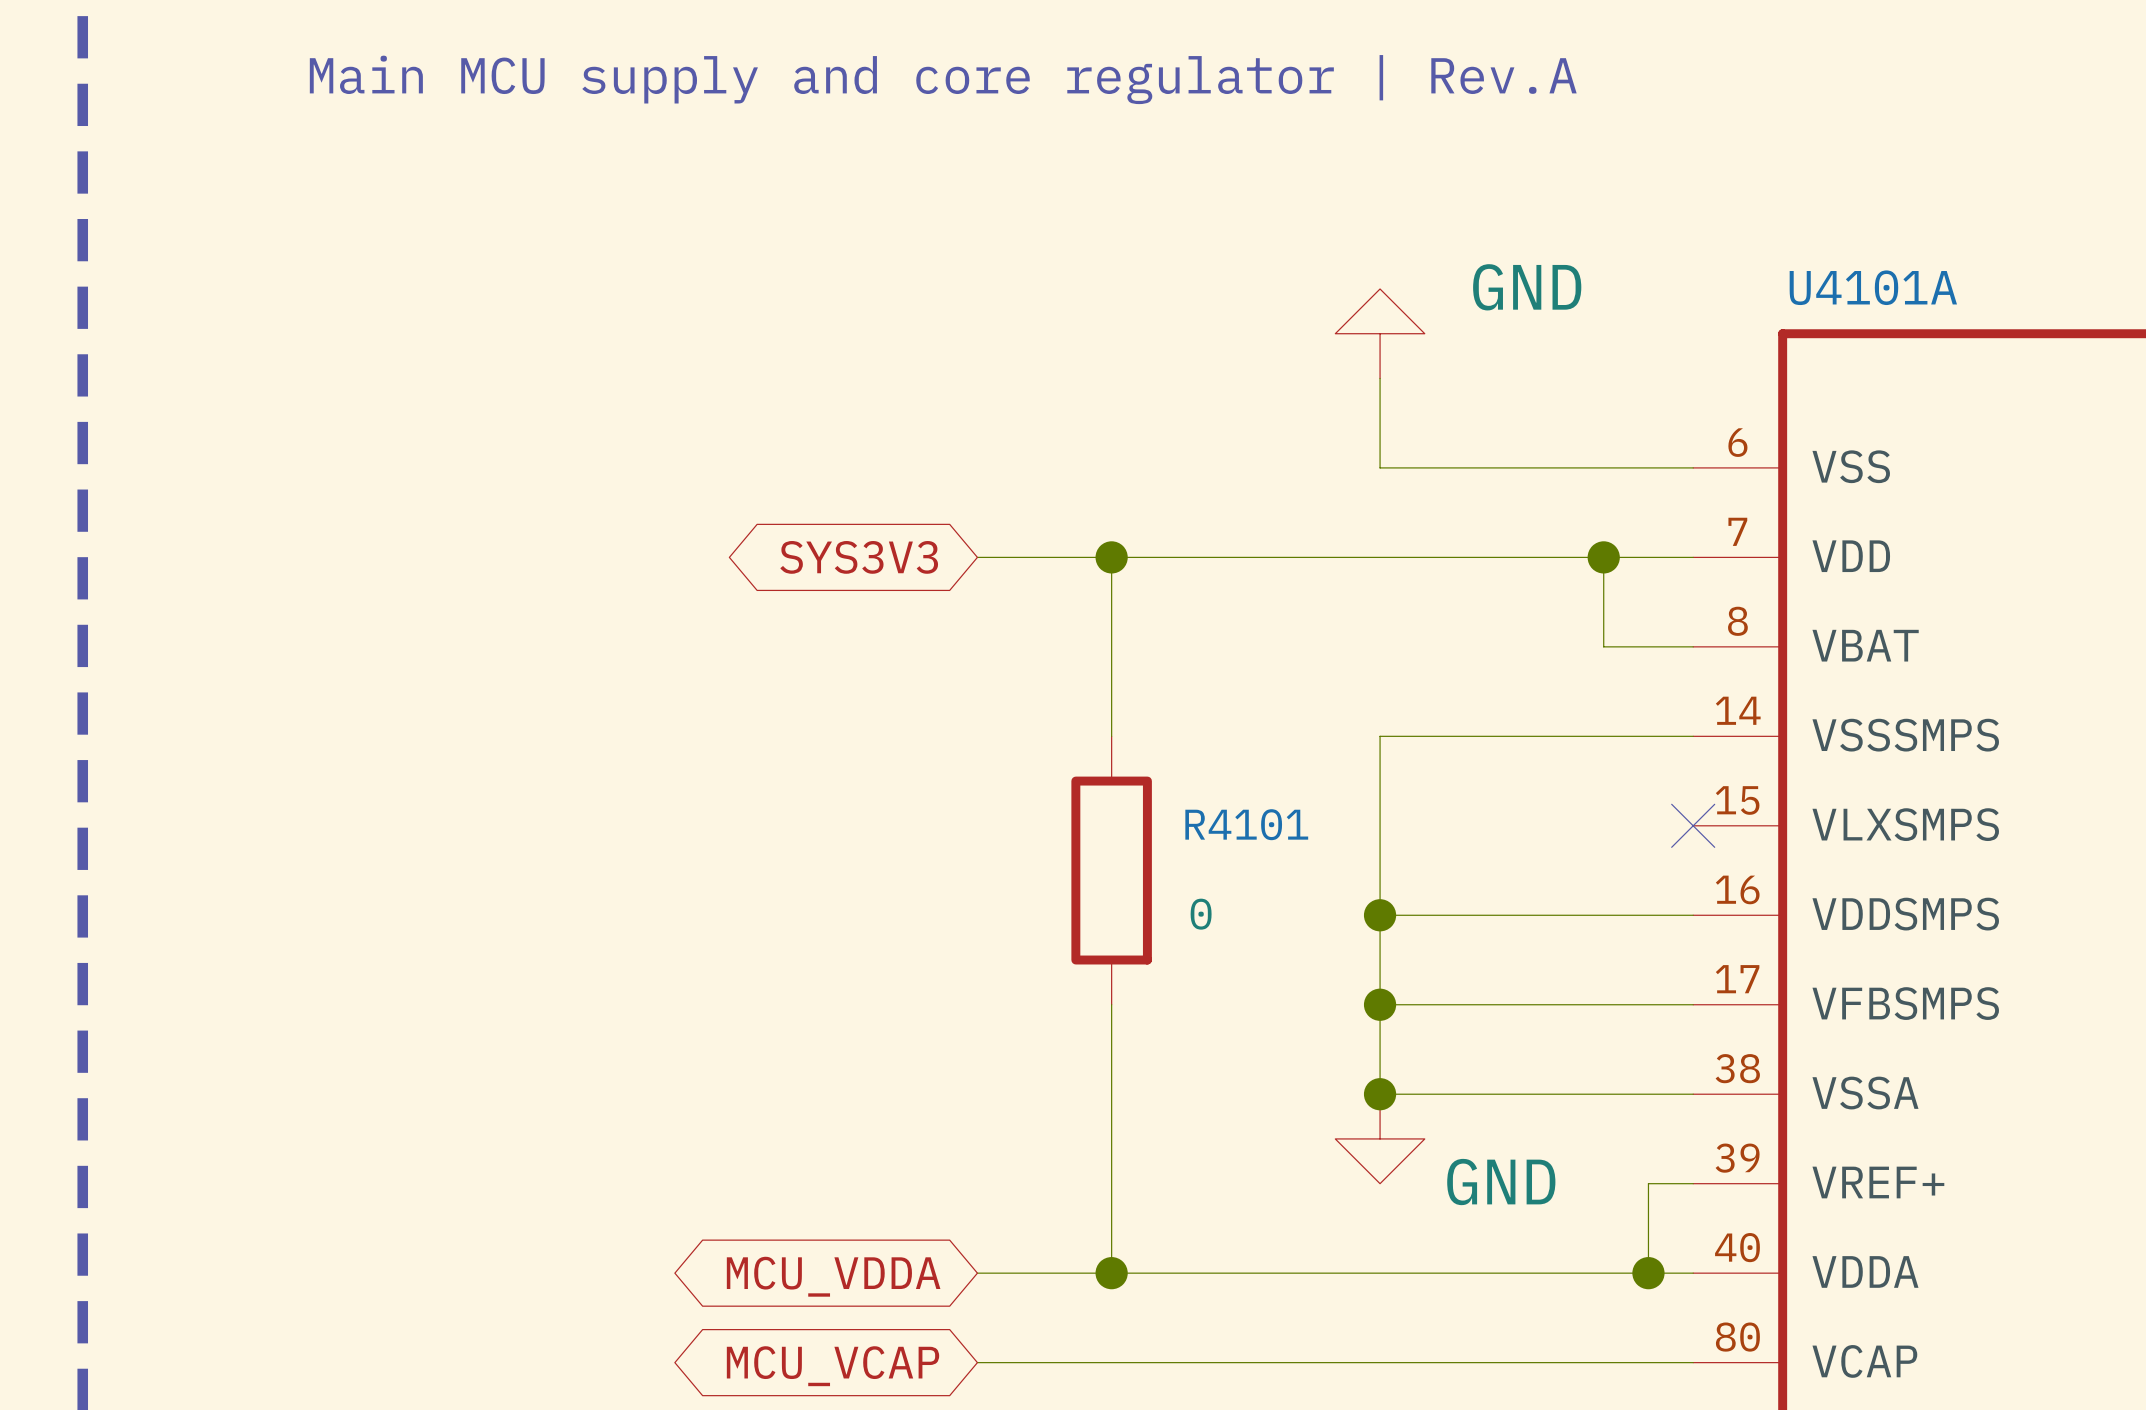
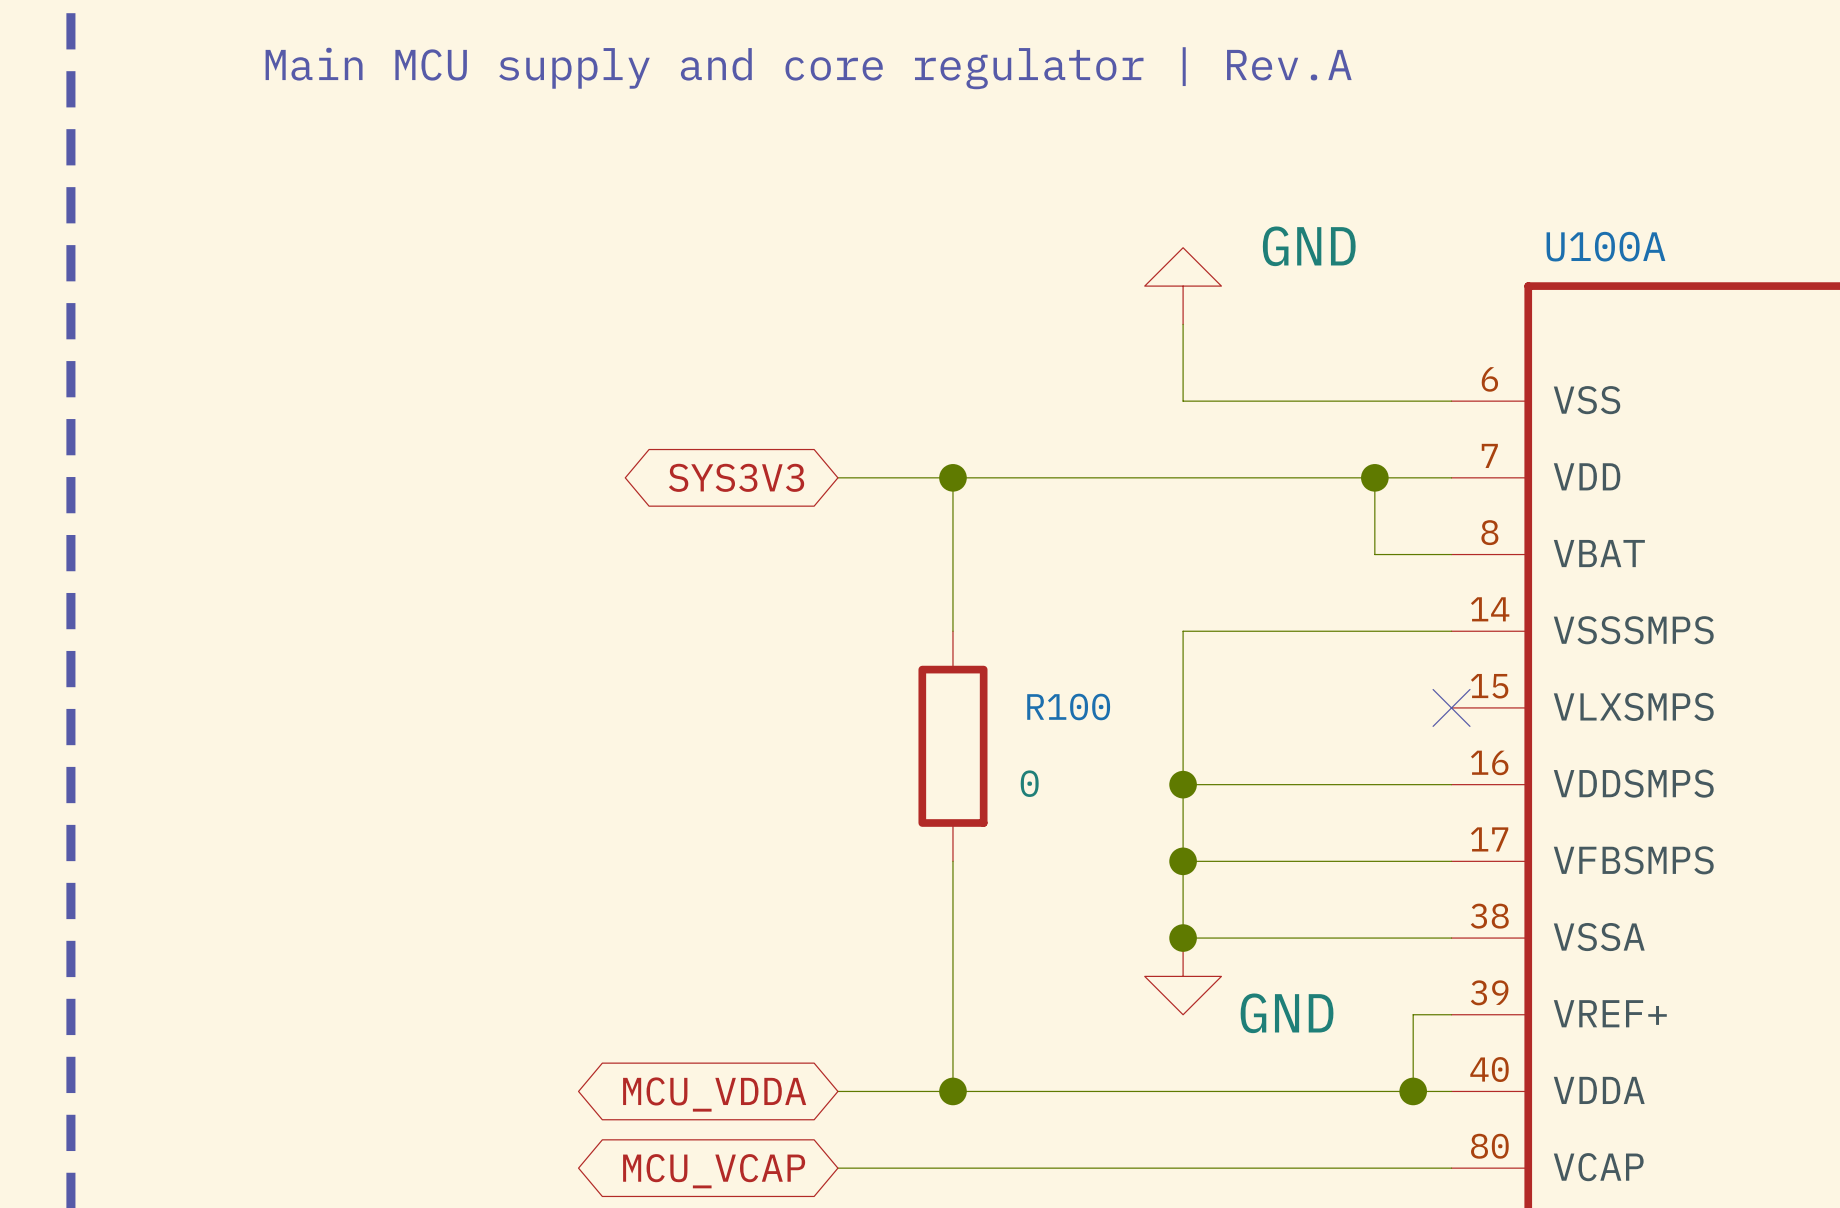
U4101A name: U4101A (1873, 287) -> U100A (1605, 246)
R4101 name: R4101 (1246, 824) -> R100 (1068, 706)

